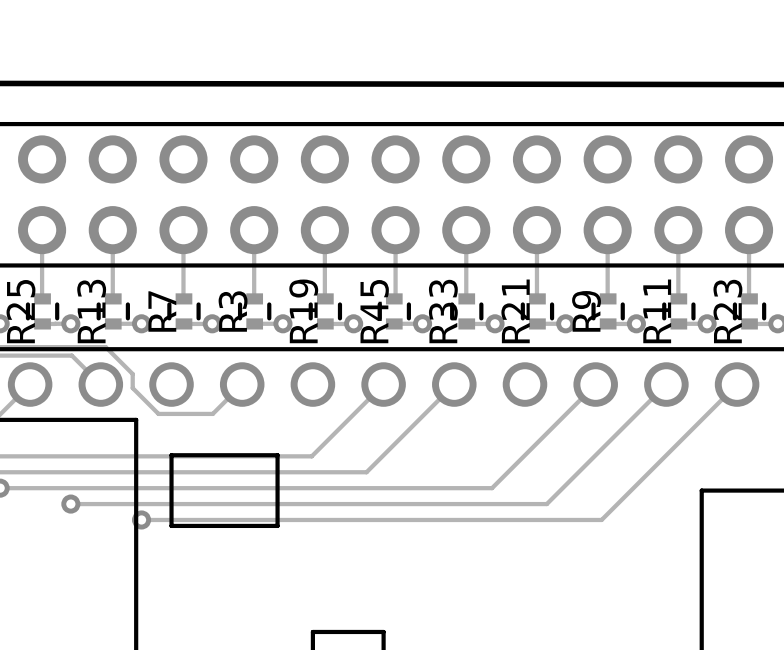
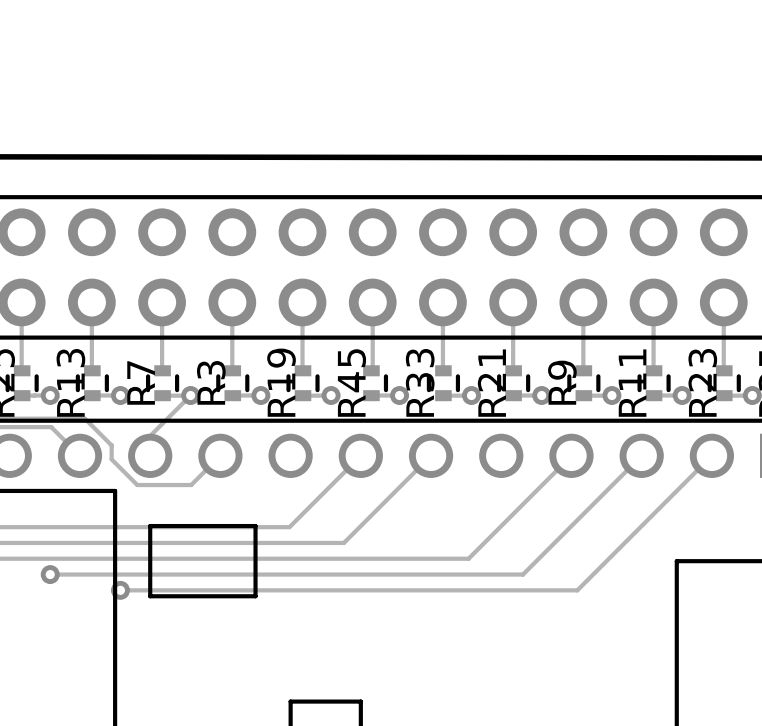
track: none -> (190, 395) (150, 435) (150, 455)

